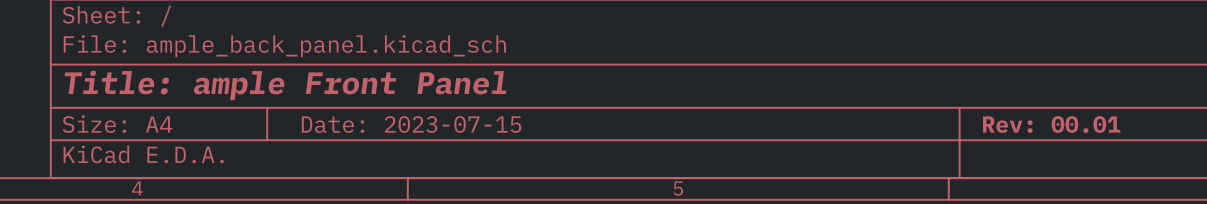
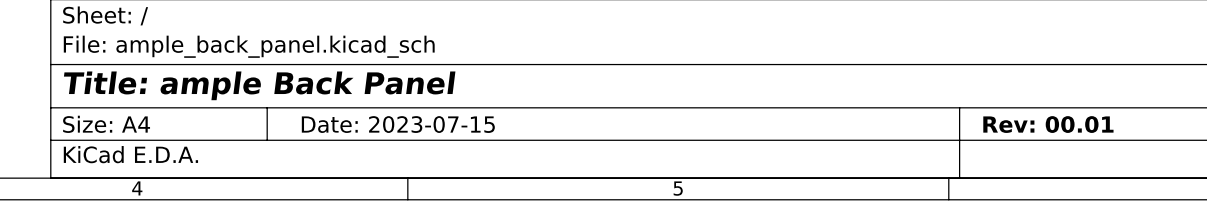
title block: Title: ample Front Panel (285, 85) -> Title: ample Back Panel (259, 85)

